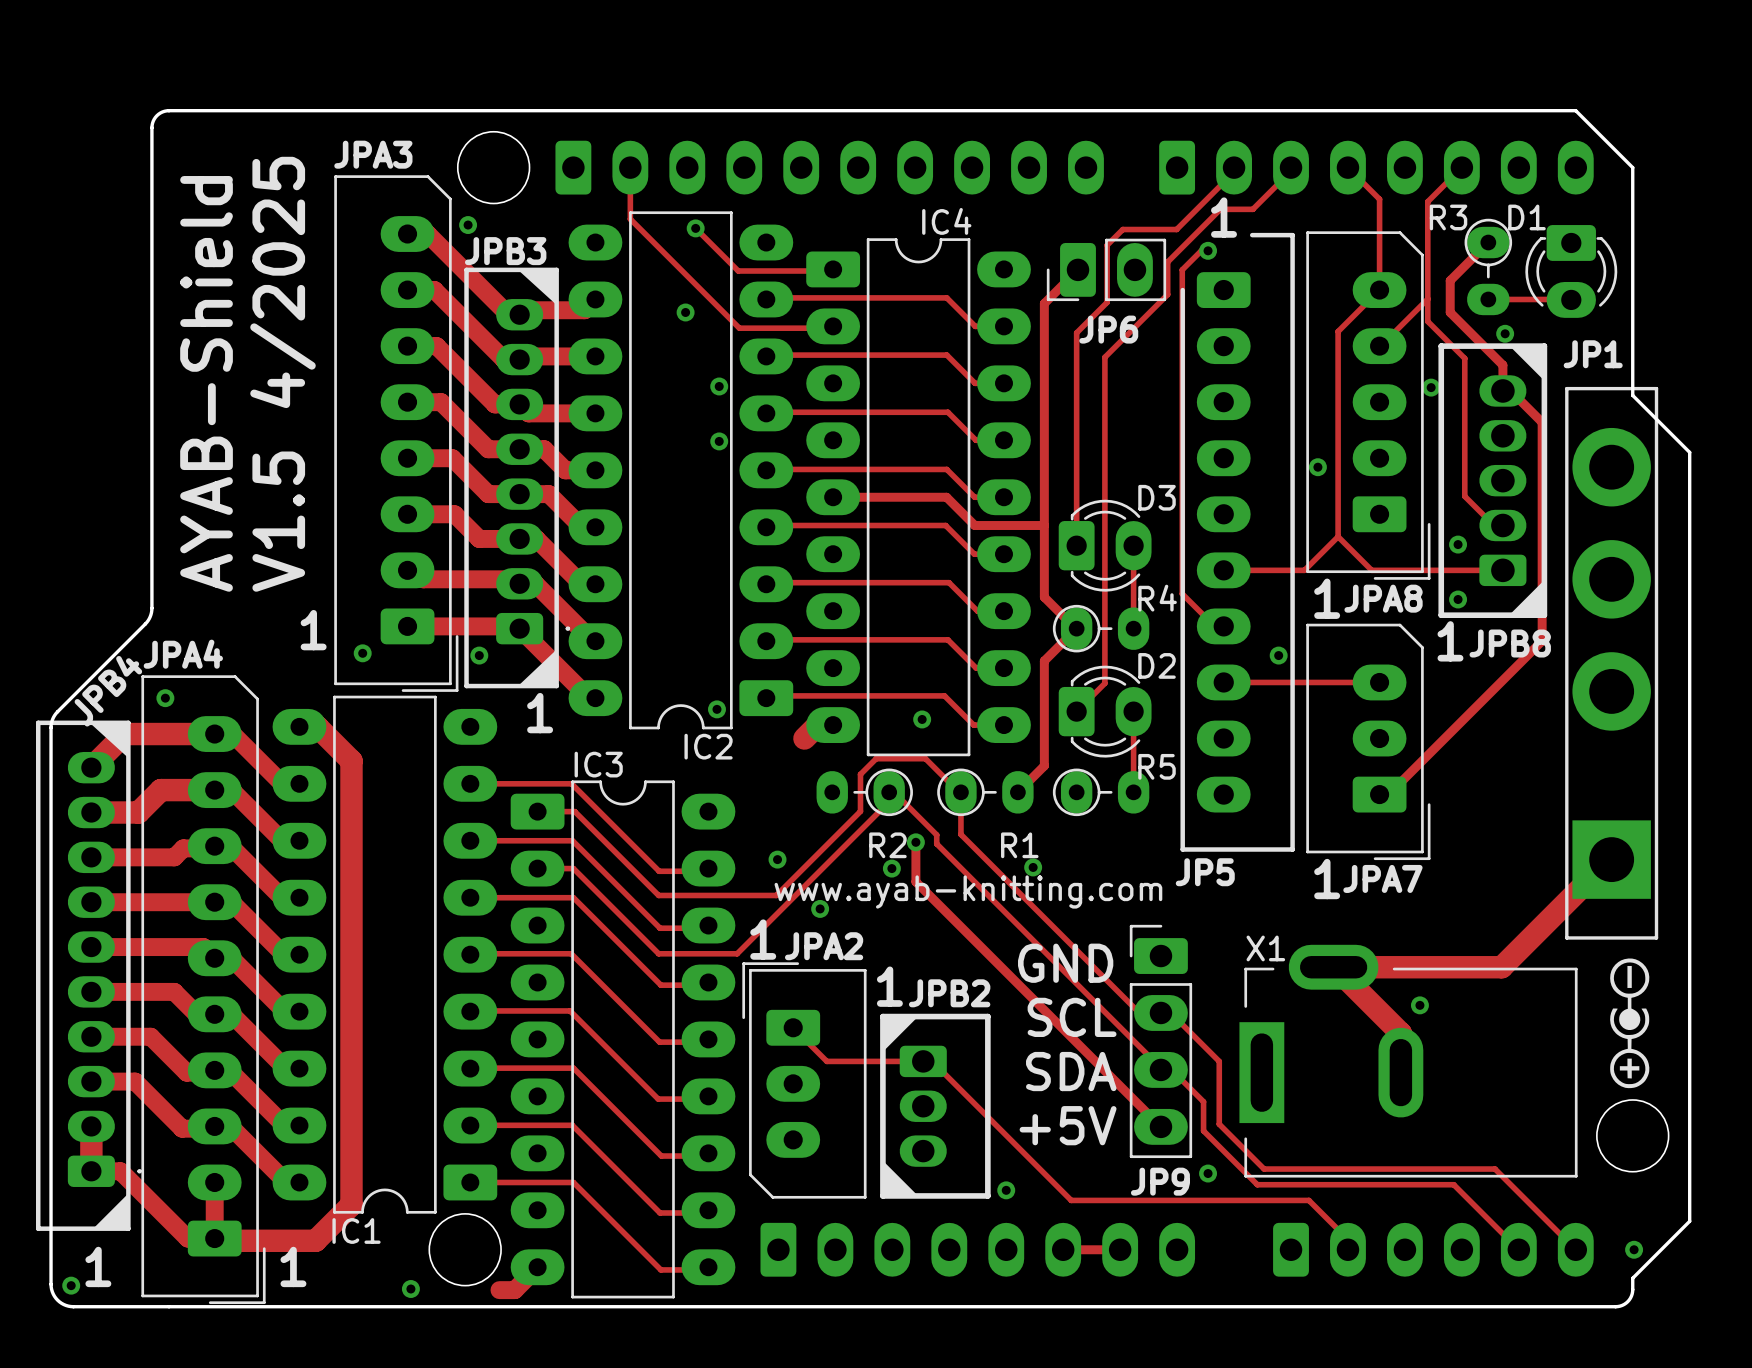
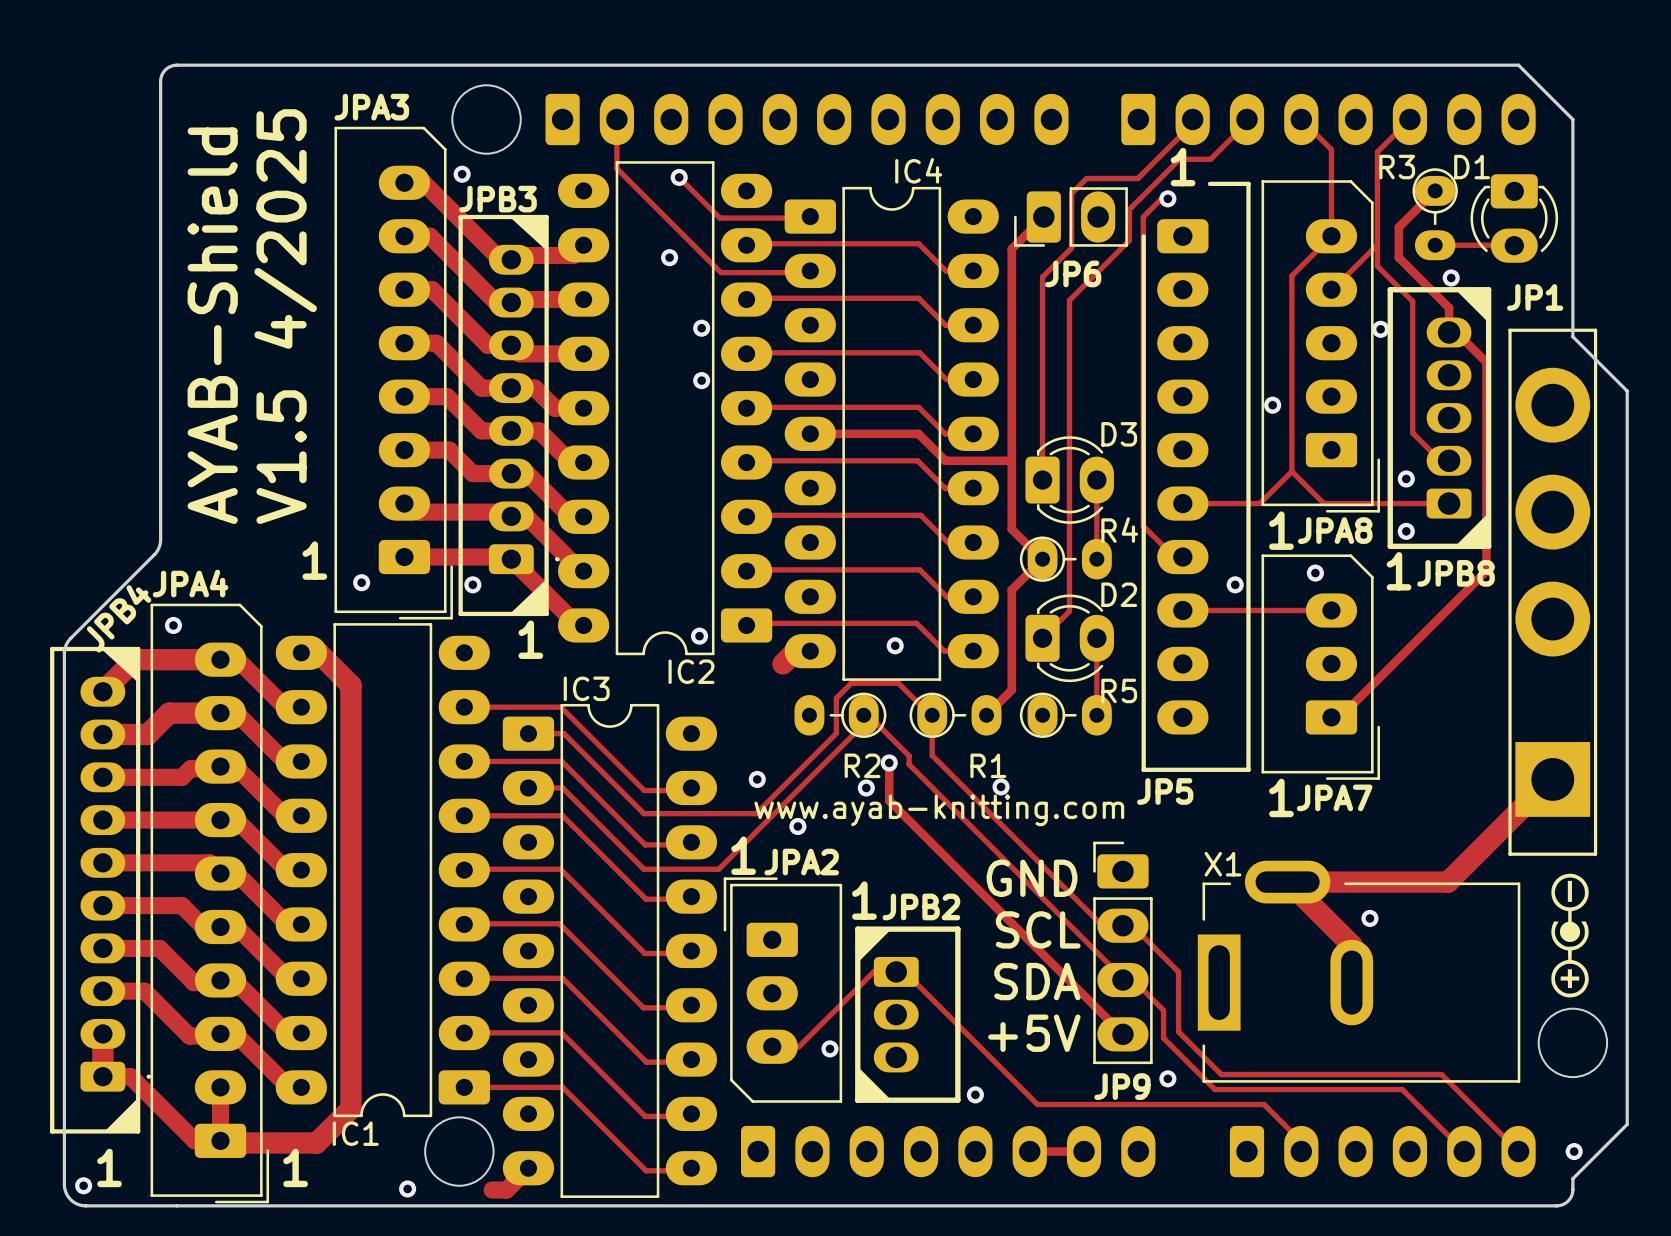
via: none -> (1315, 573)
track: (793, 1027) (826, 1061) (899, 1061) -> (772, 1046) (798, 1046) (873, 971)
via: none -> (829, 1048)

